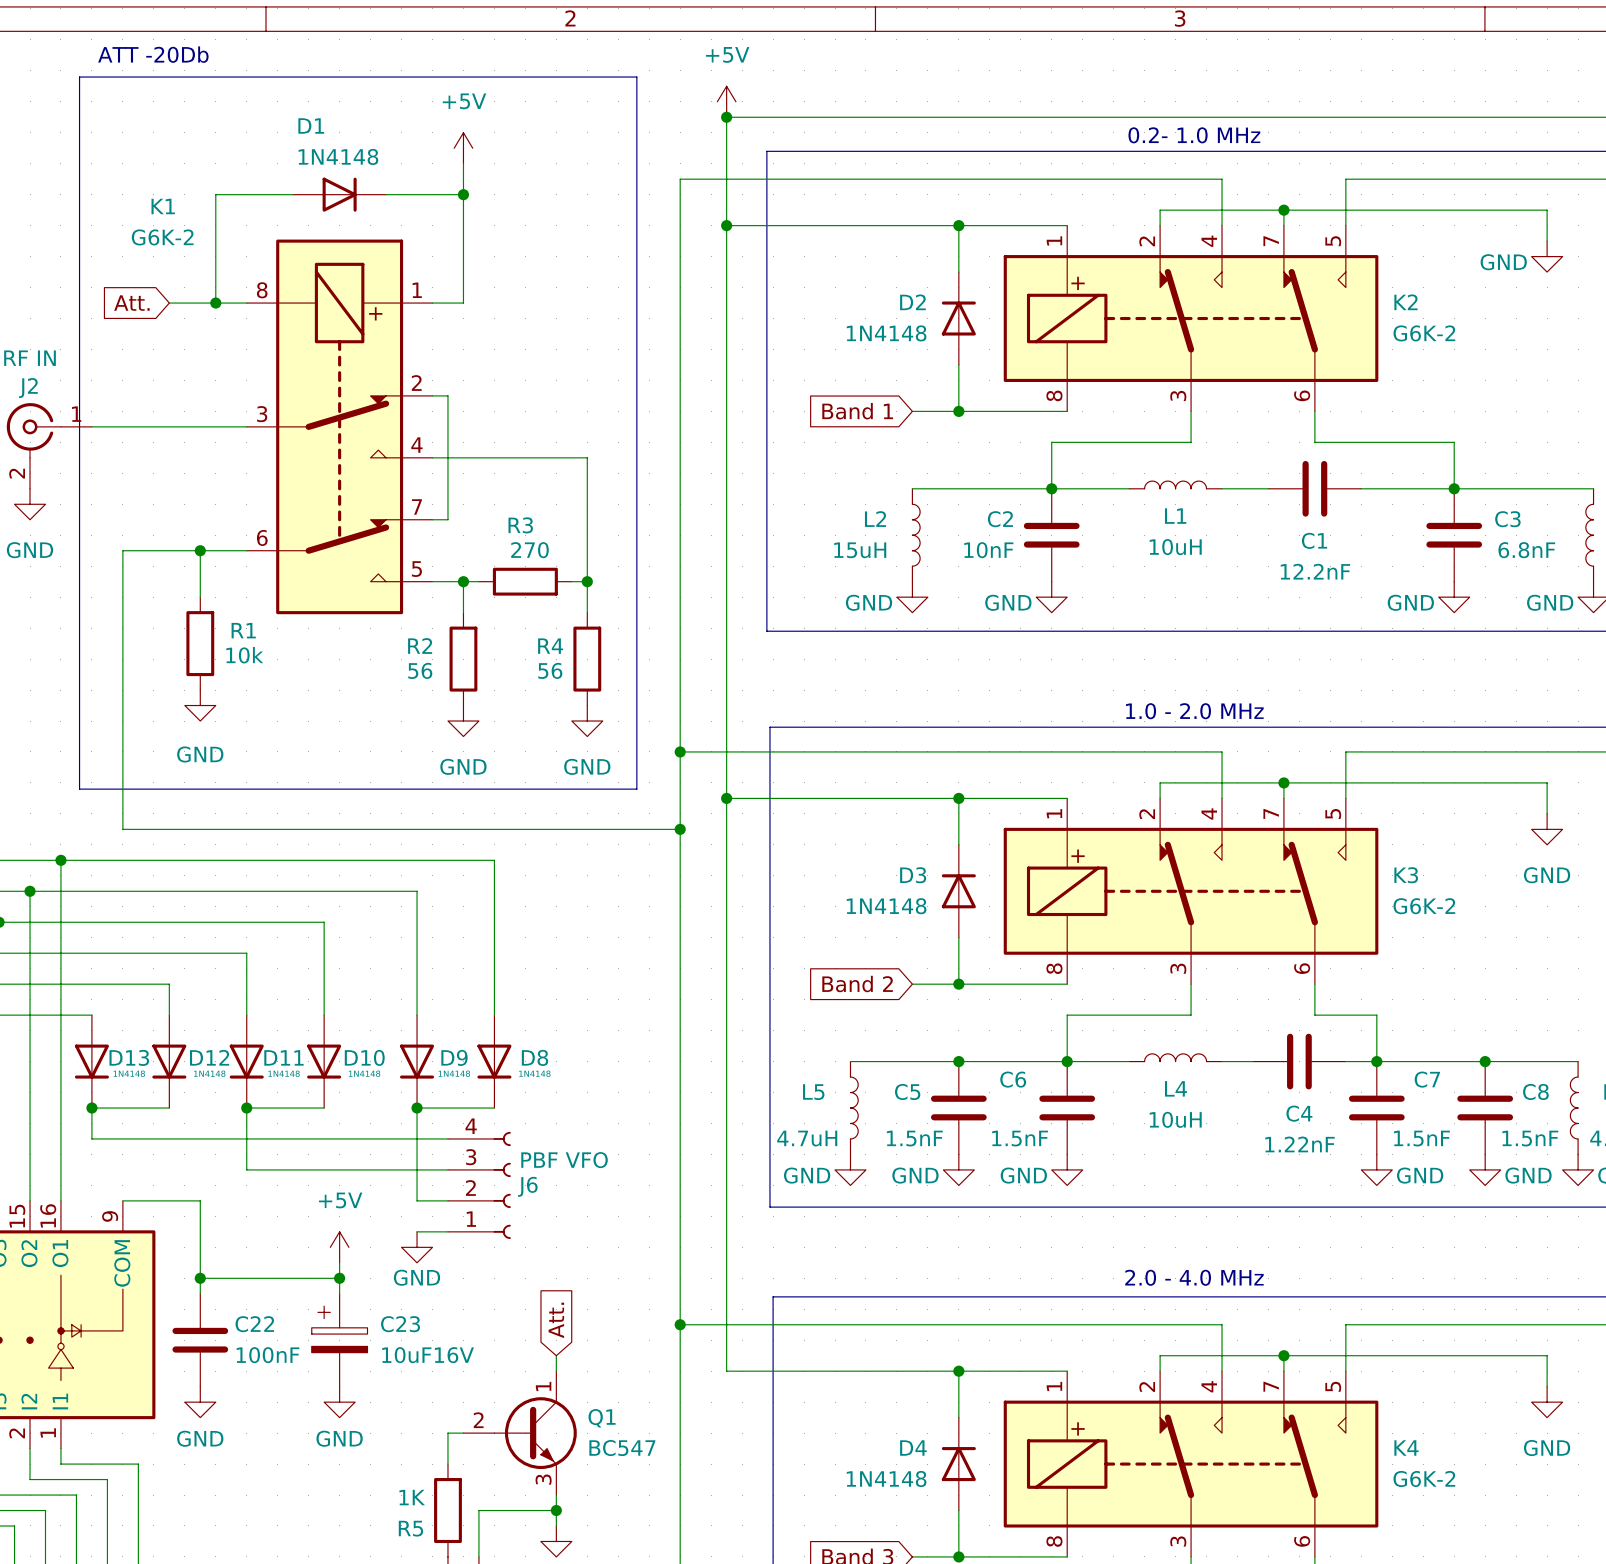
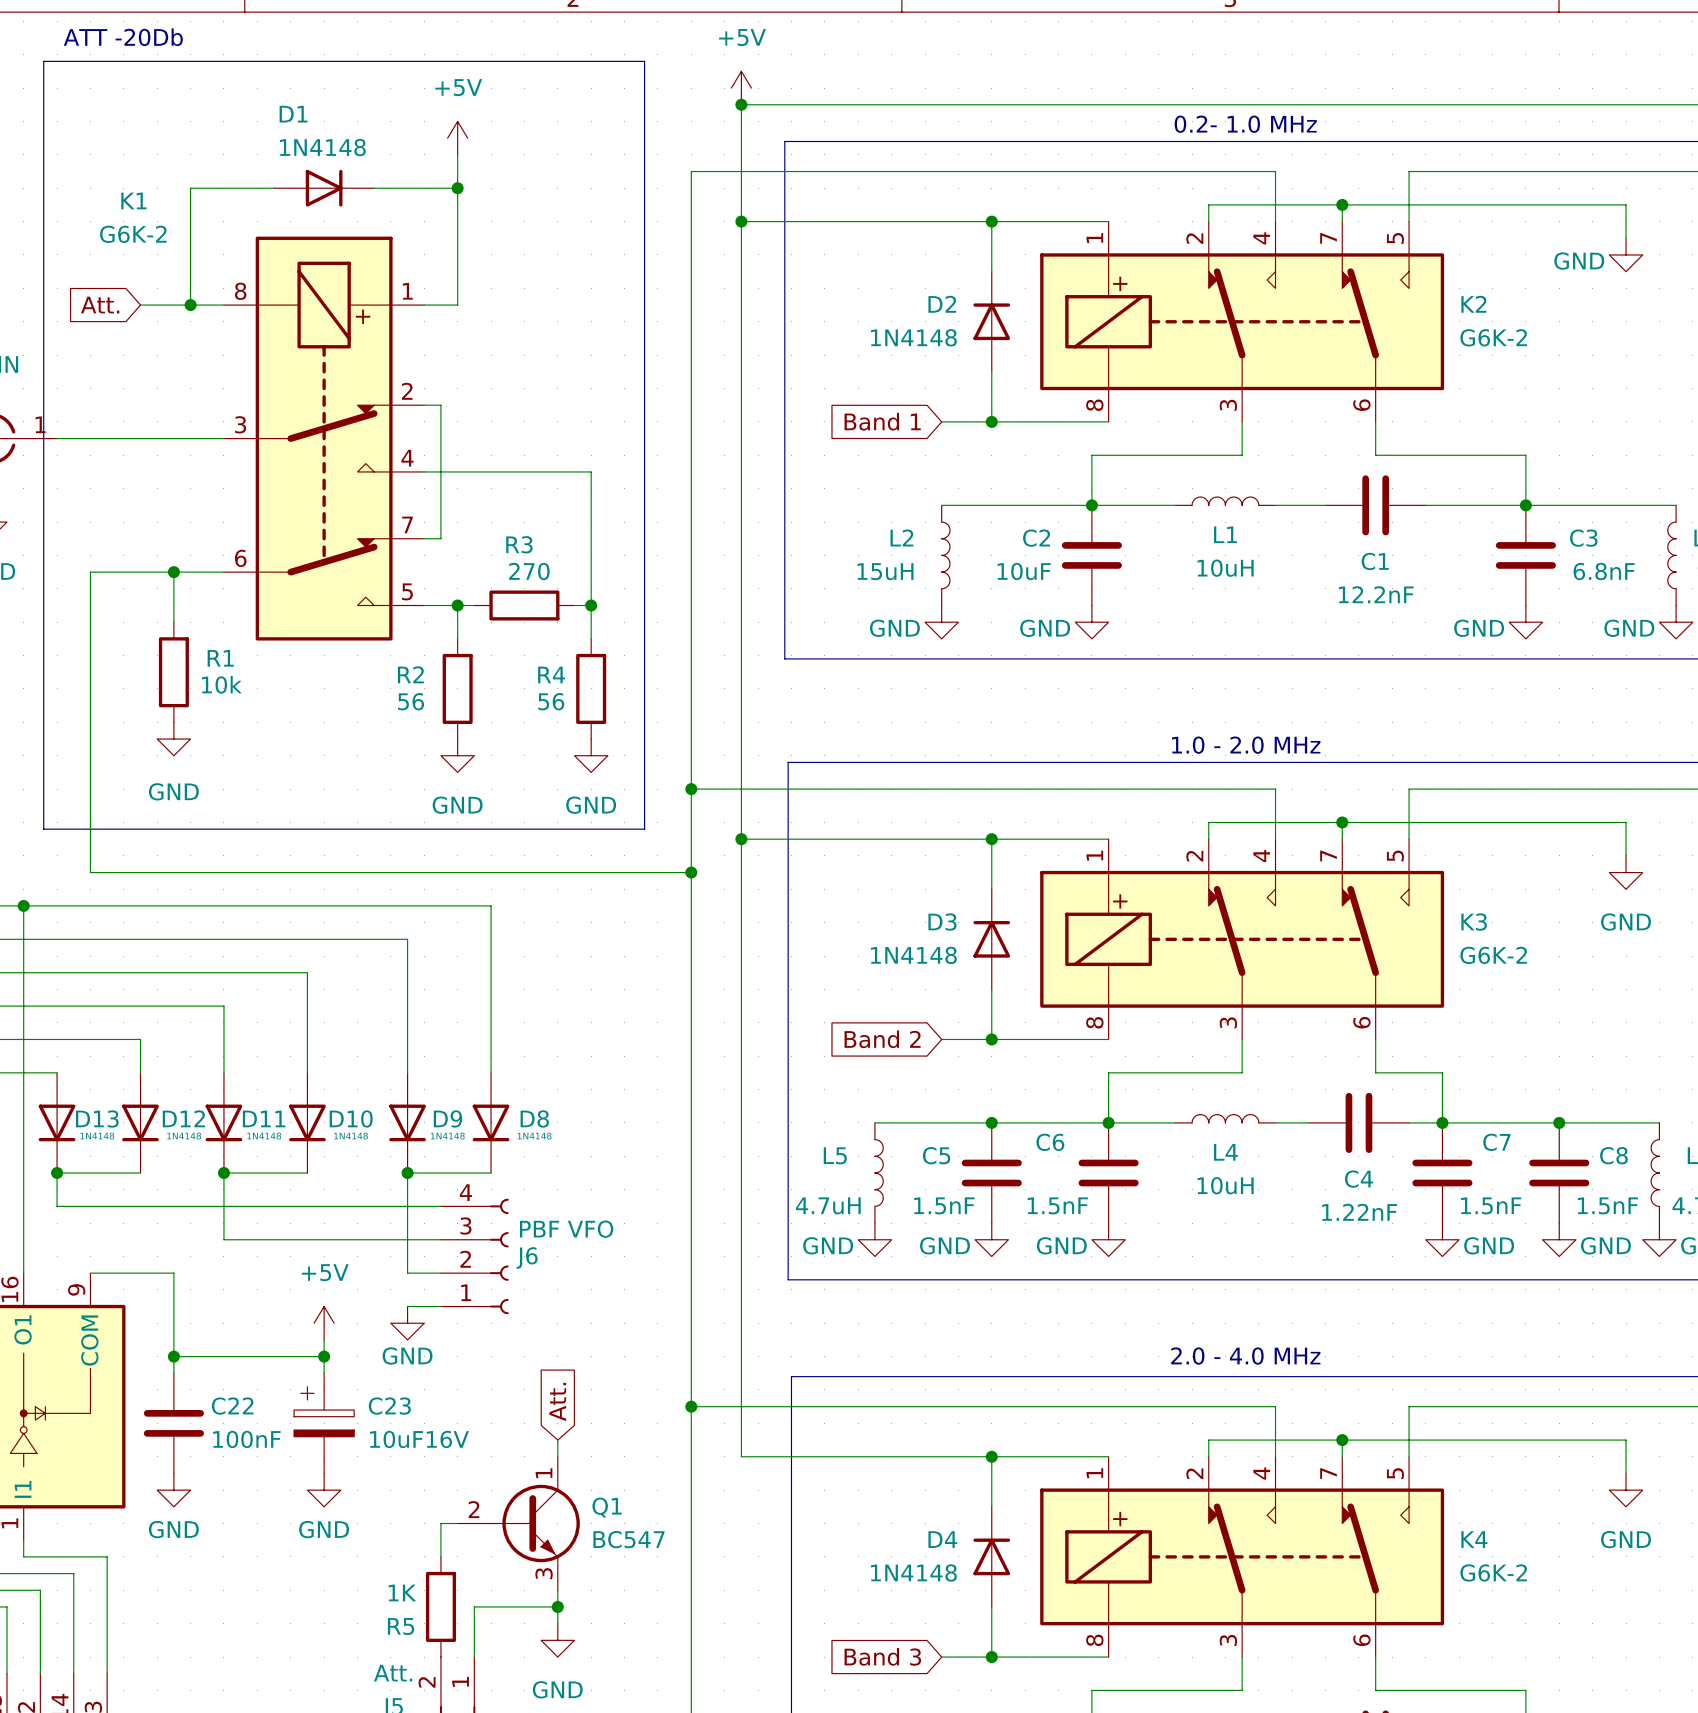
C2 value: 10nF (988, 550) -> 10uF (1024, 571)

